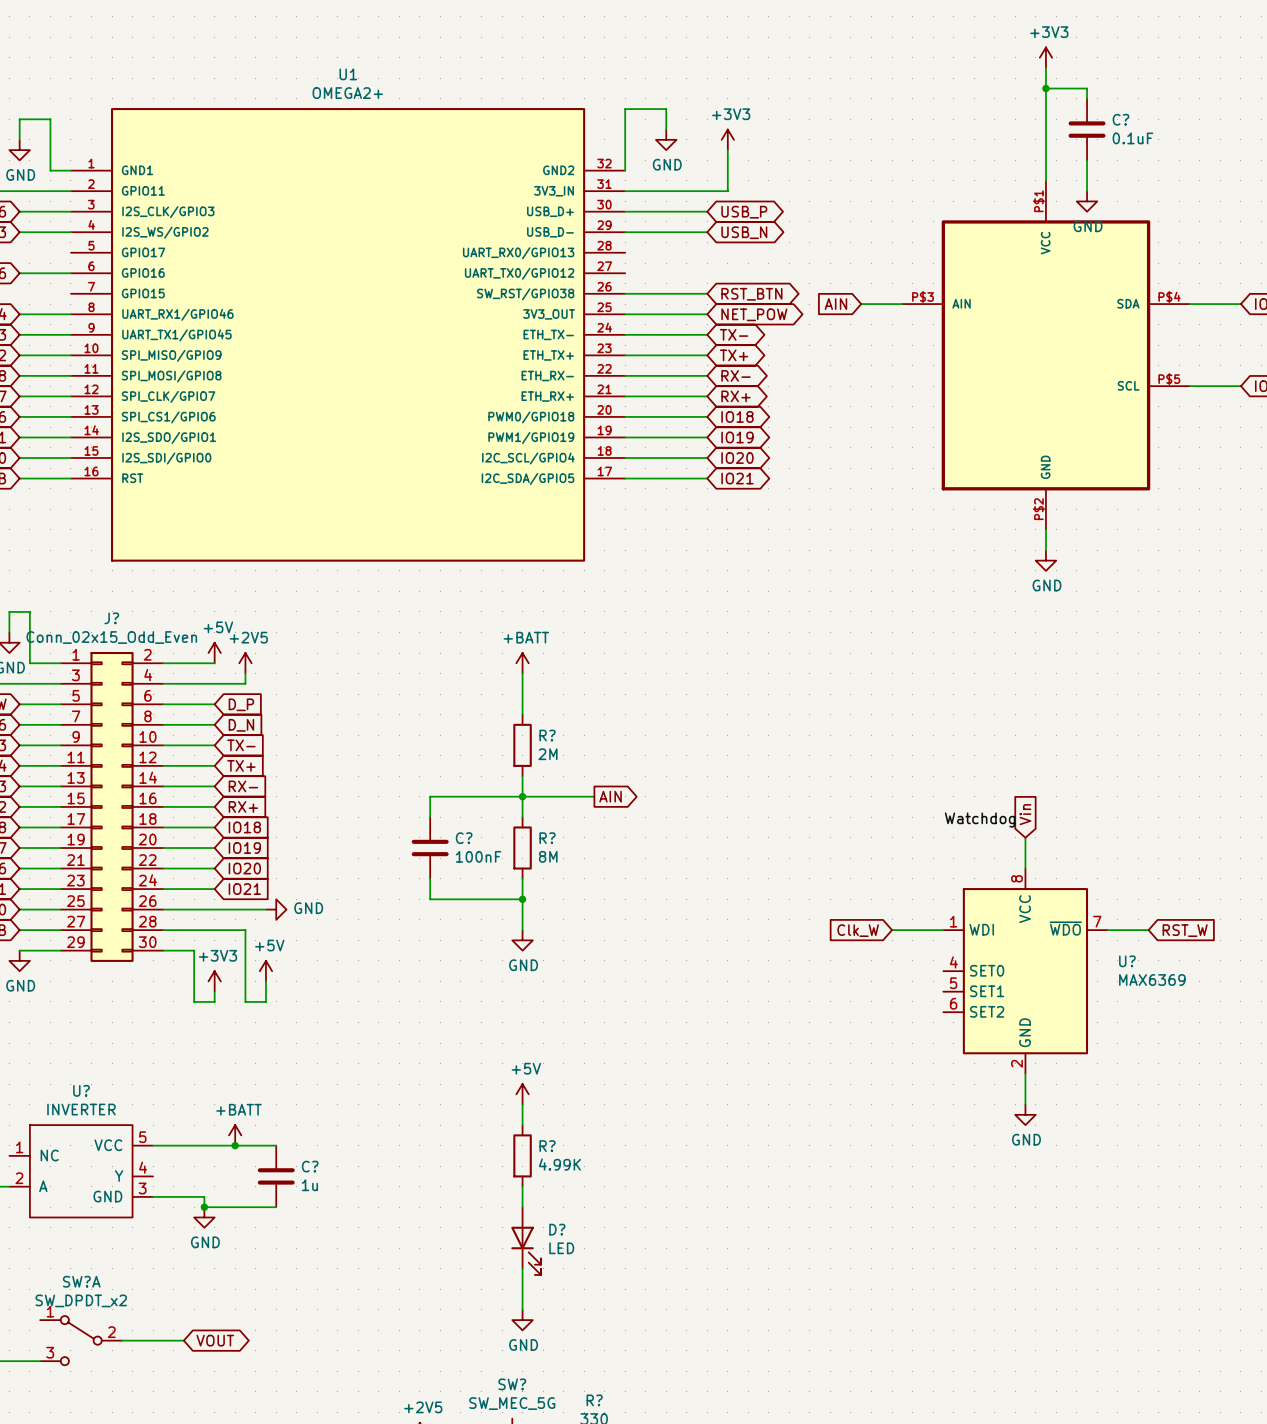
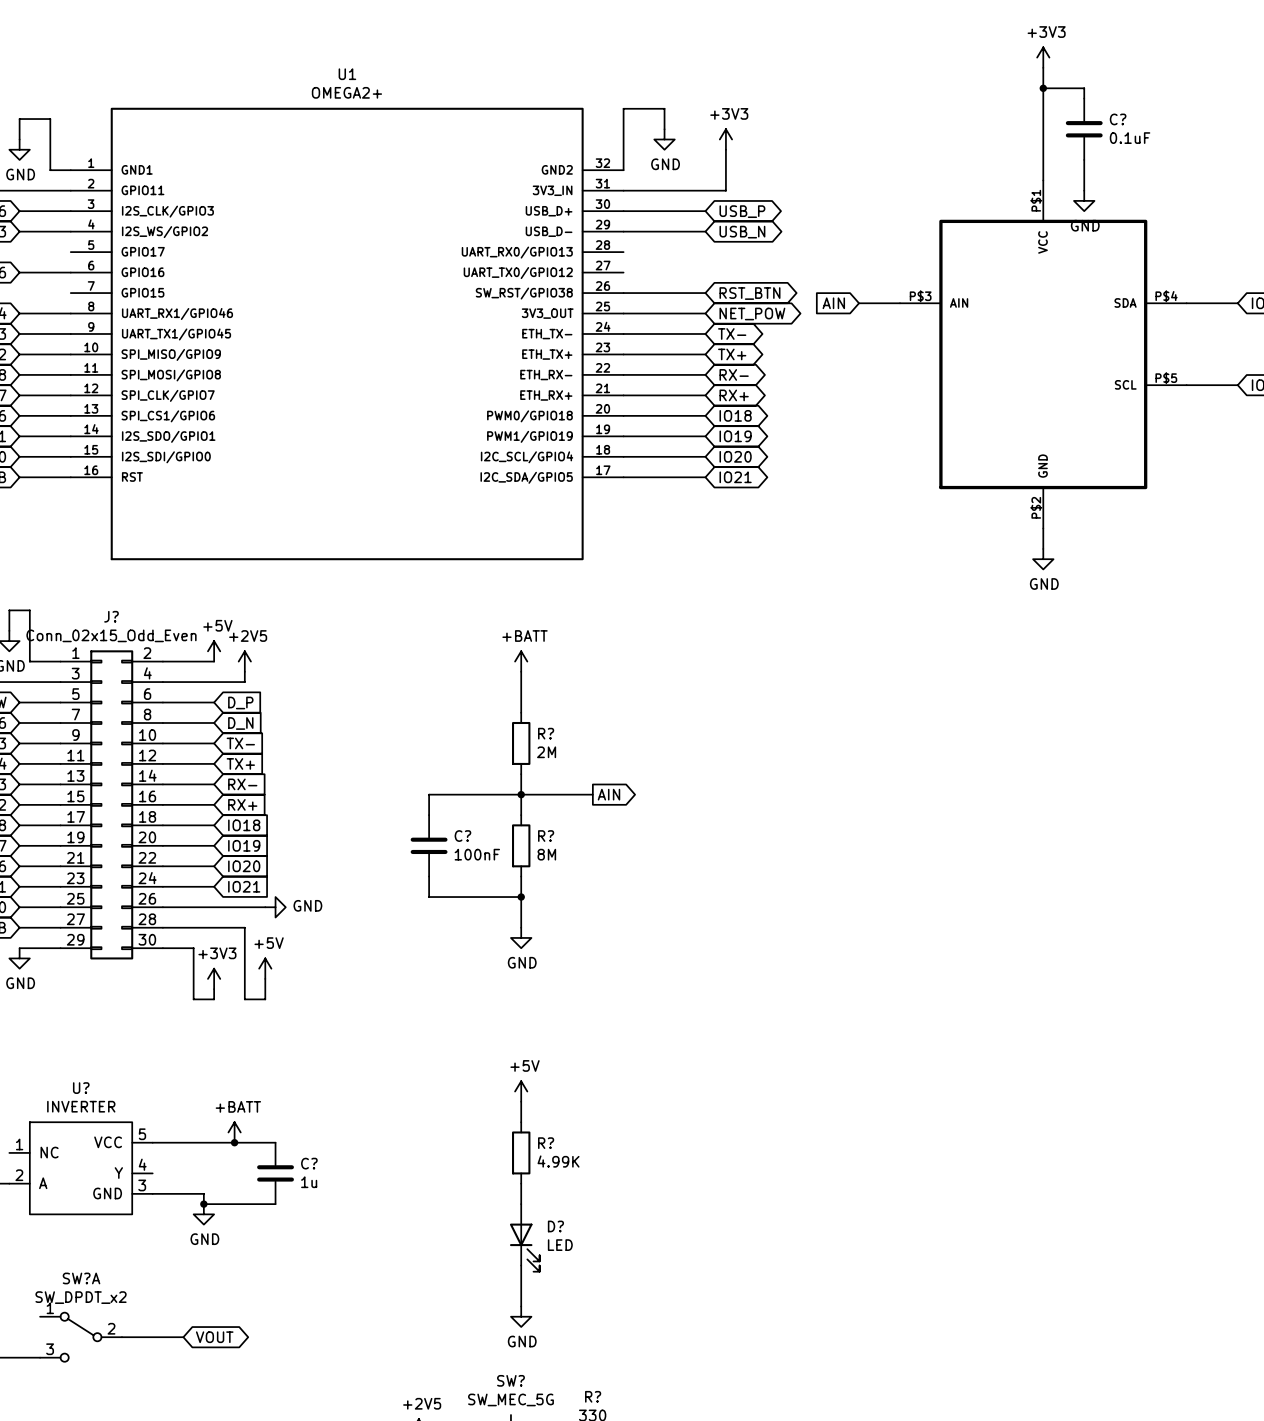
global label: Vin (1025, 814) -> none
label: Watchdog (980, 820) -> none
wire: (1025, 837) (1025, 868) -> none
global label: Clk_W (858, 930) -> none
wire: (892, 930) (943, 930) -> none
wire: (1107, 930) (1148, 930) -> none
global label: RST_W (1185, 930) -> none
U?: MAX6369 (1025, 971) -> none
wire: (1025, 1073) (1025, 1104) -> none
power symbol: GND (1025, 1114) -> none

